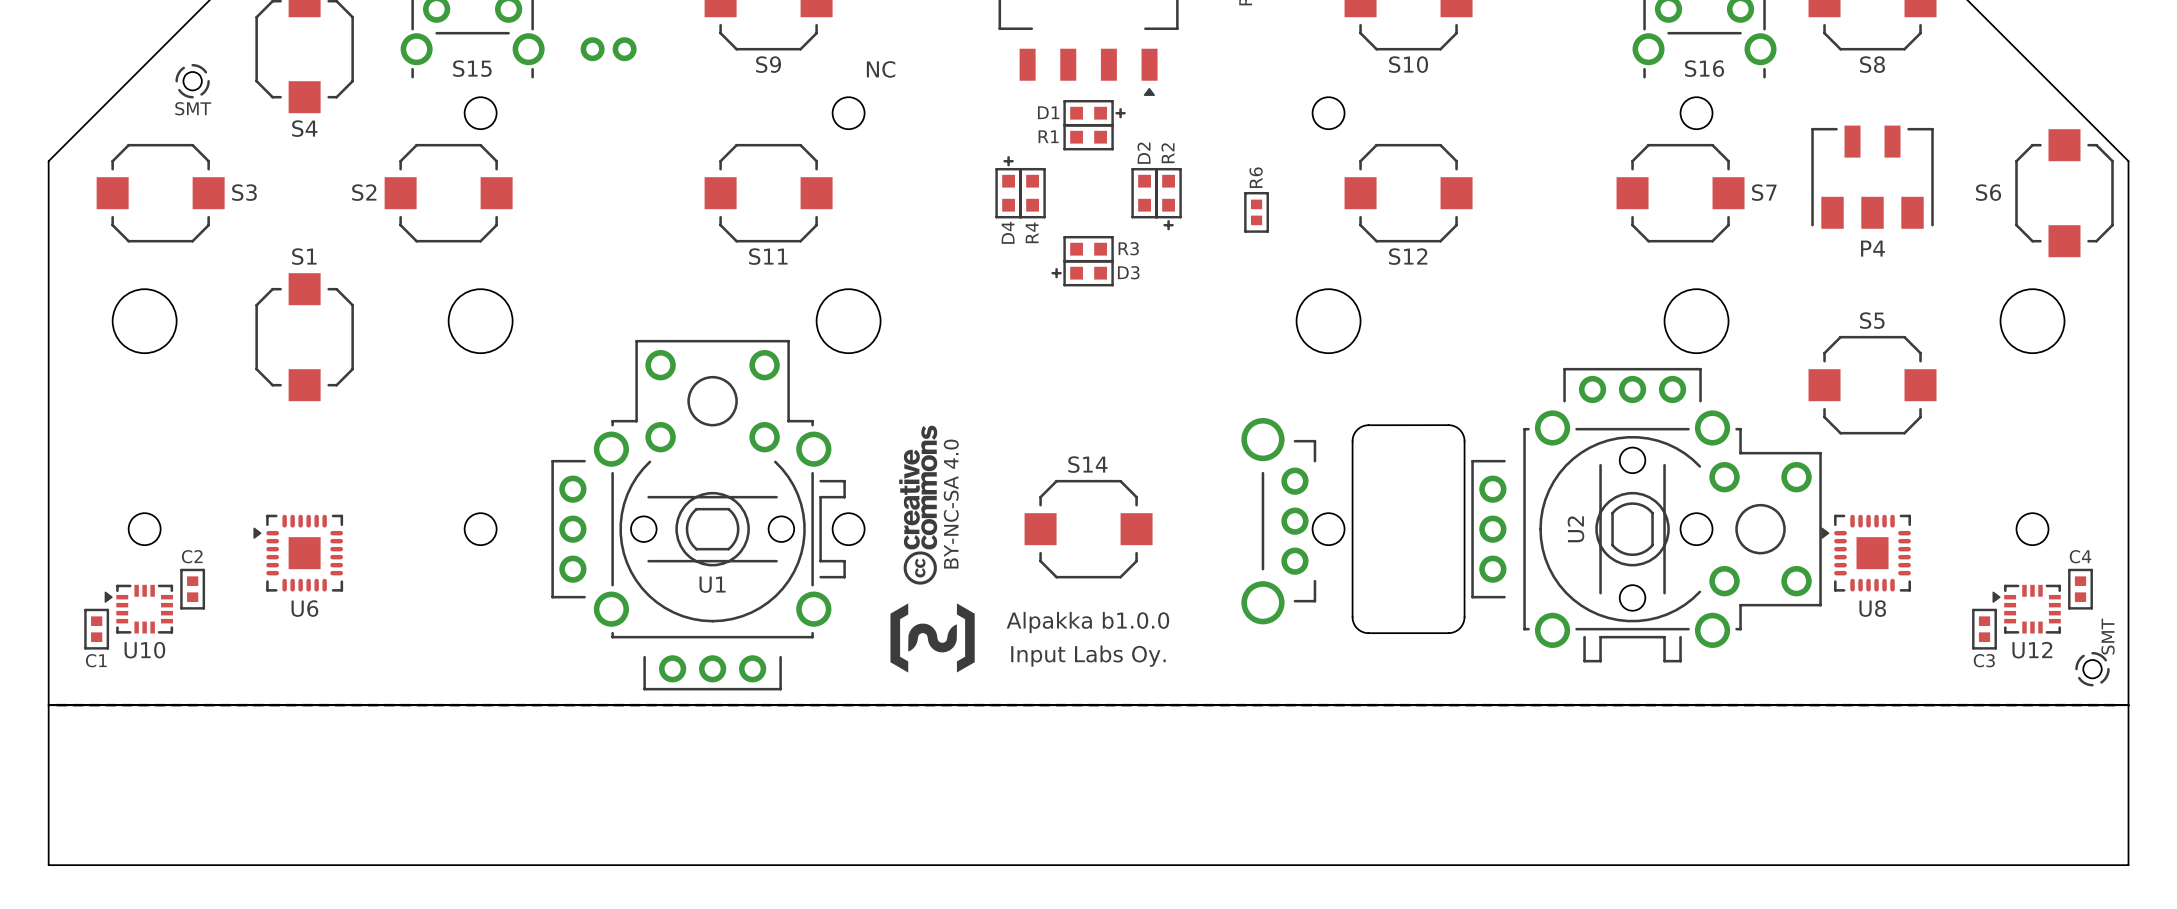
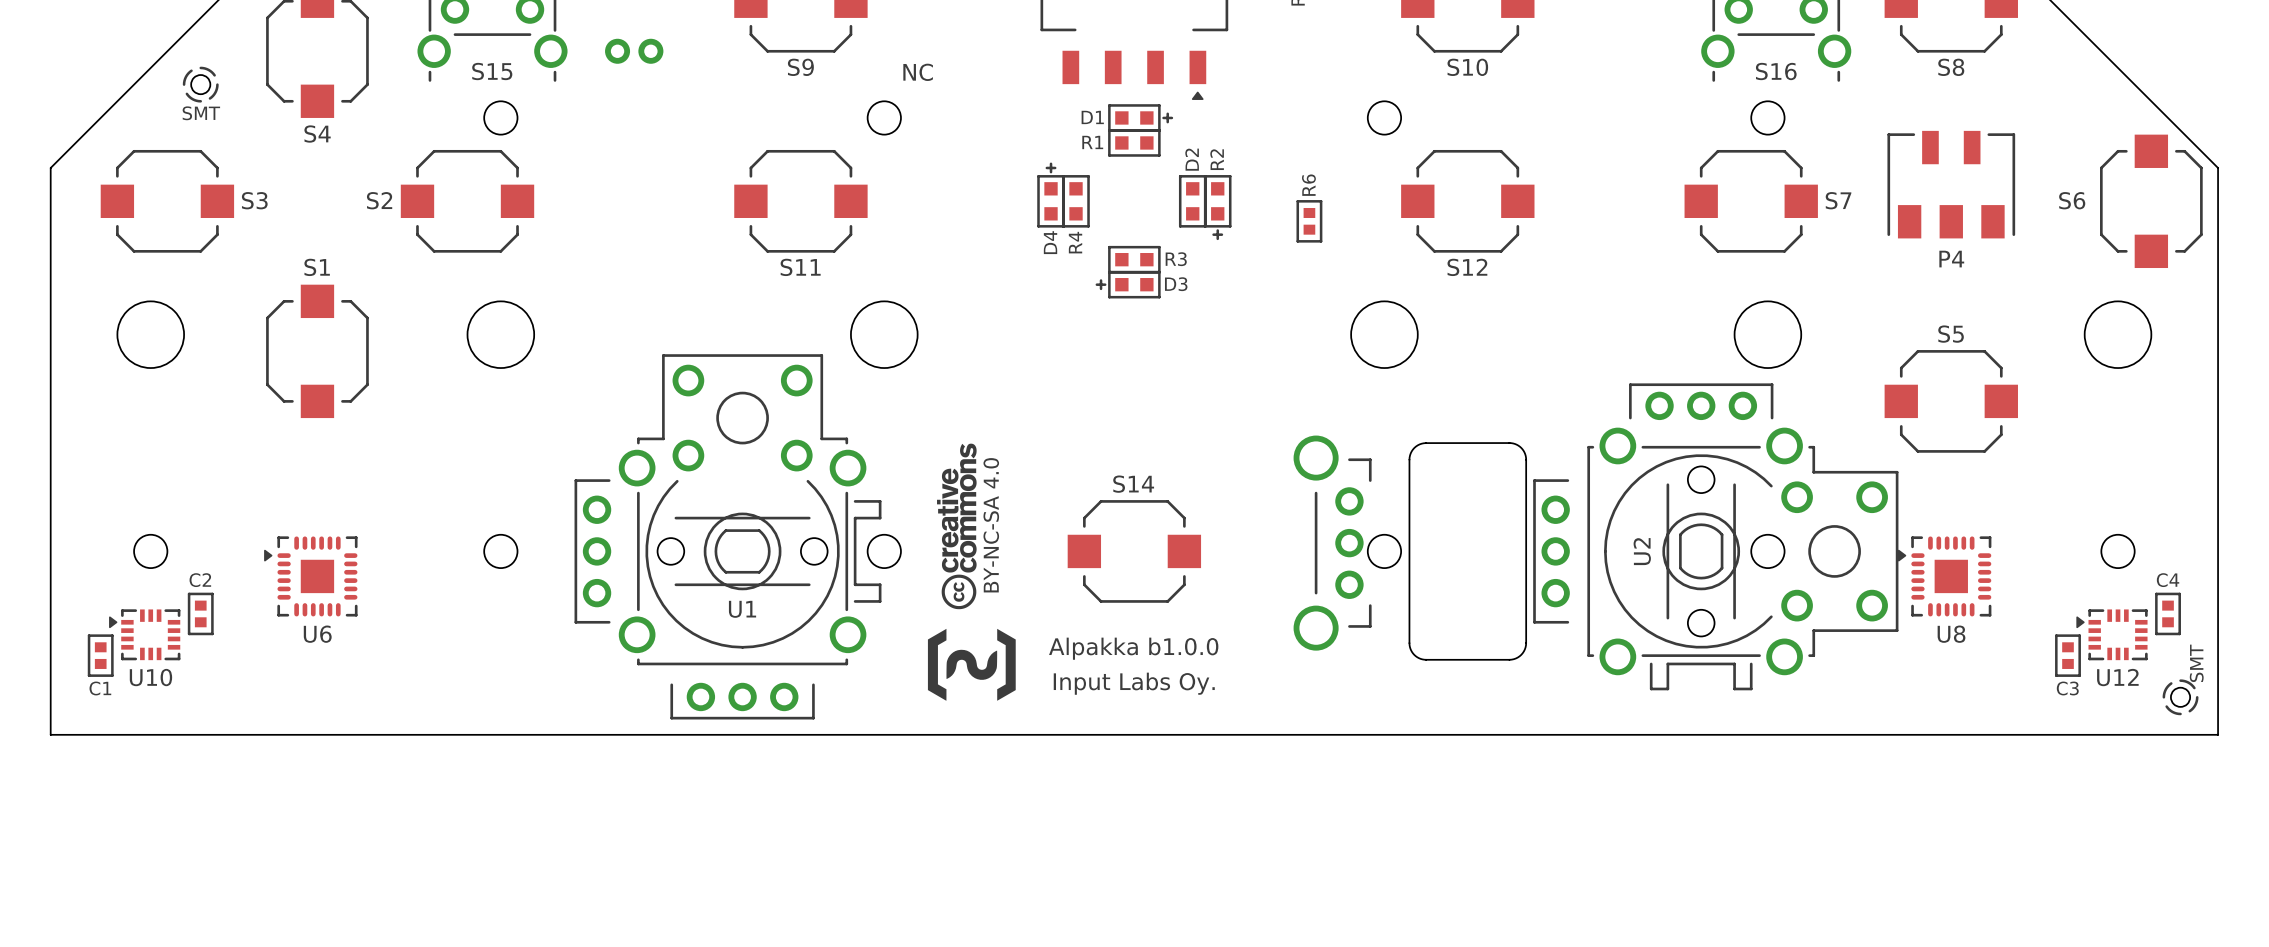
board edge: (48, 705) (48, 865) (2128, 865) (2128, 705) (48, 705) -> none

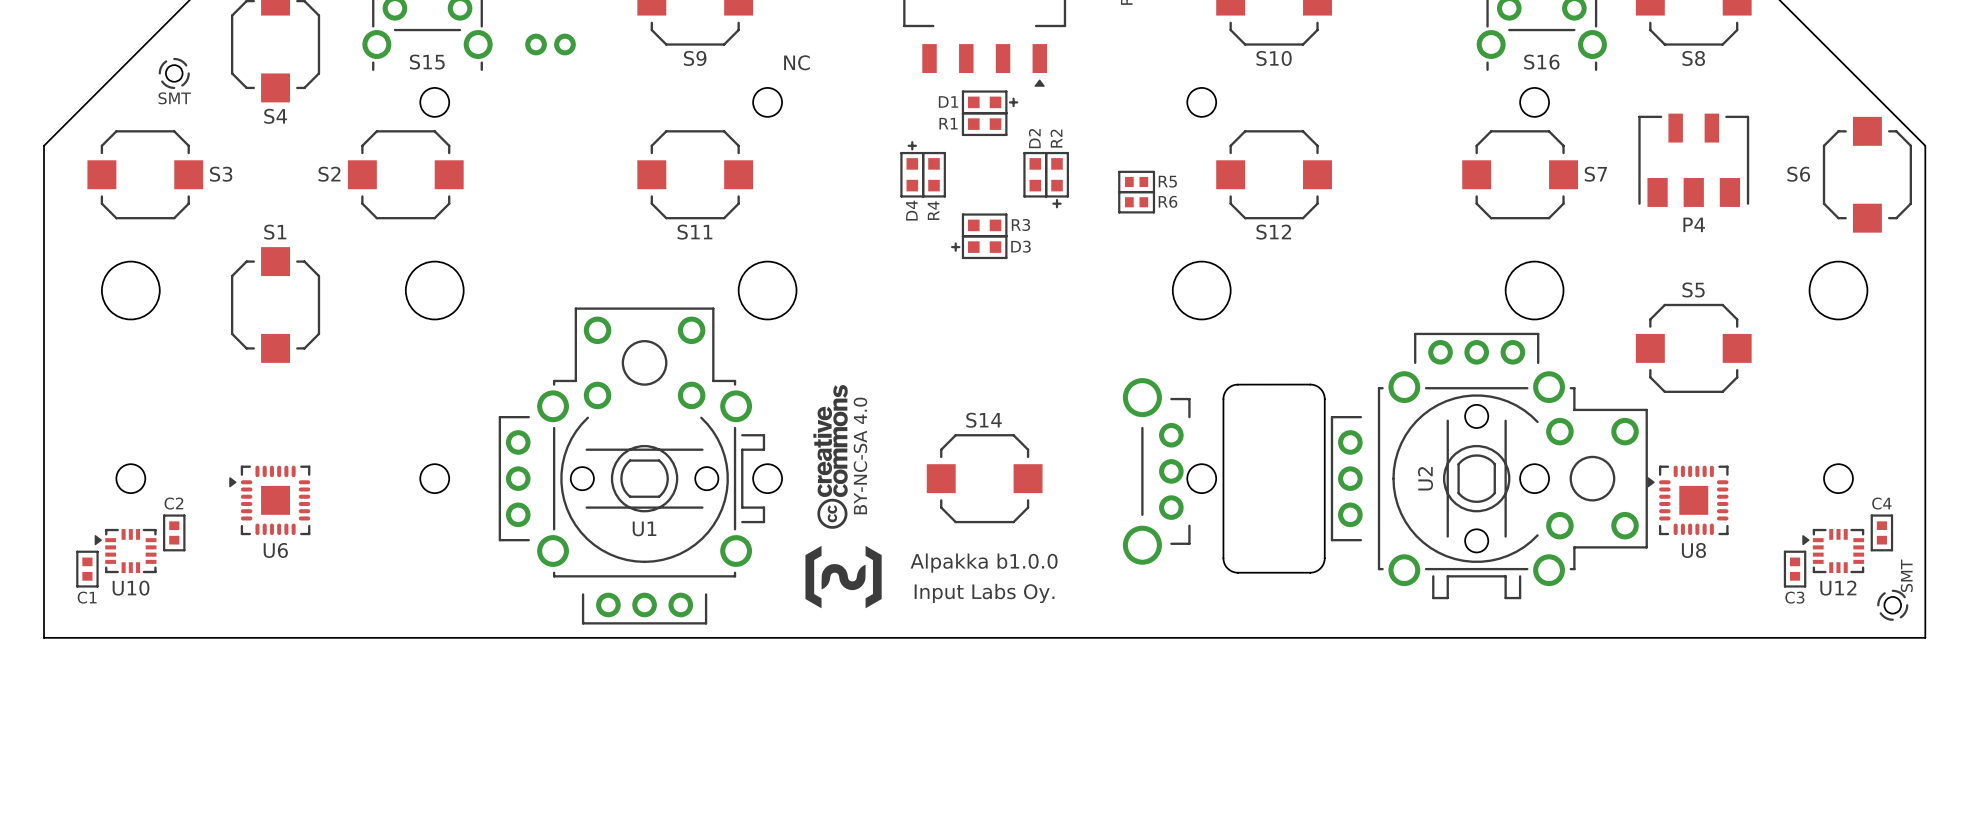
R5: none -> (1136, 181)
R6 rotation: 0° (1309, 221) -> 90° clockwise (1136, 202)

